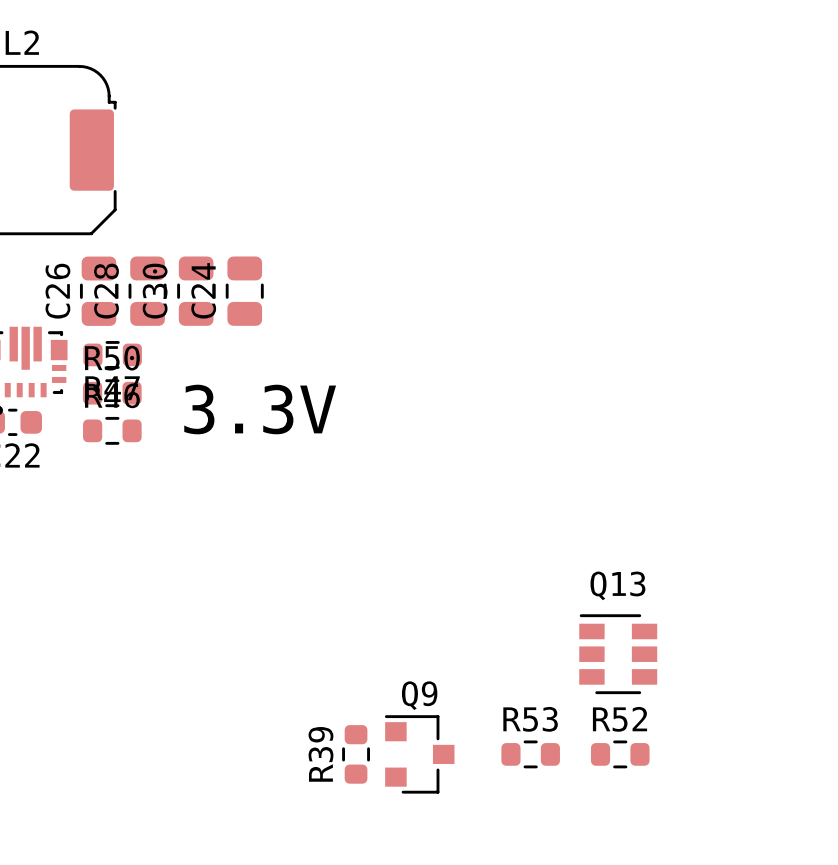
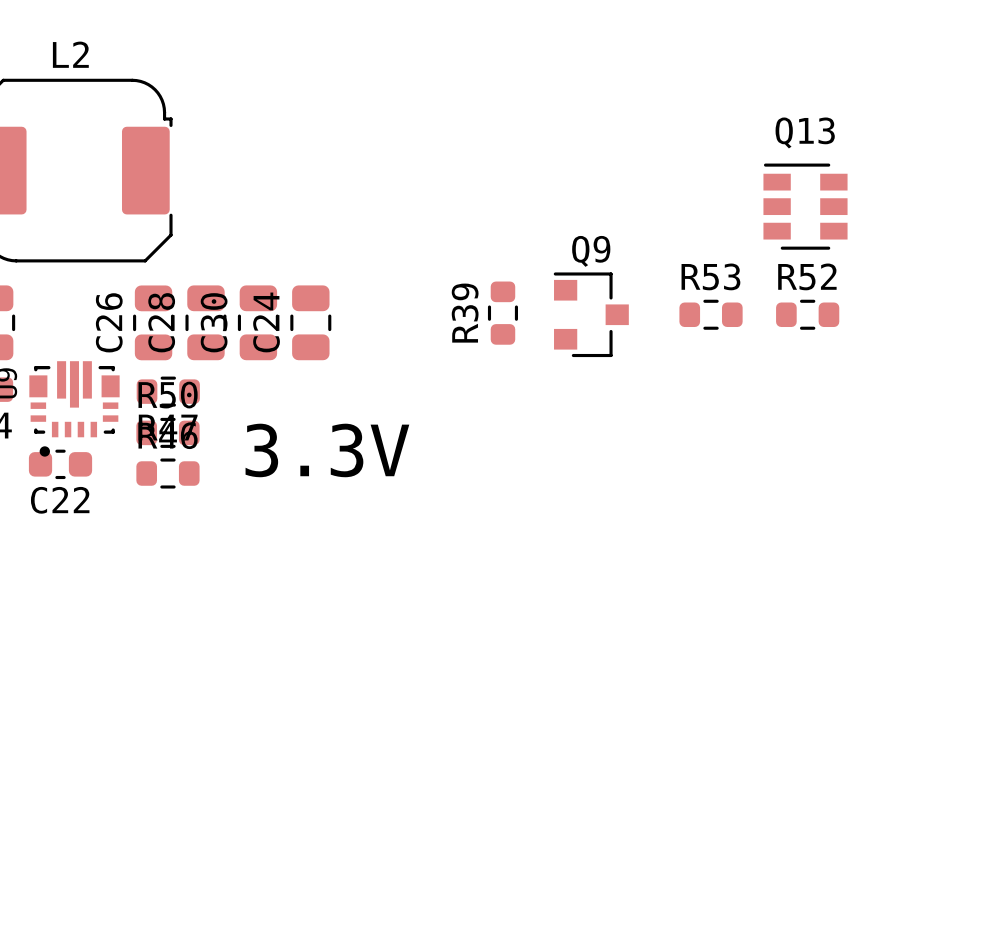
Q13 position: (618, 654) -> (805, 206)
R39 position: (356, 754) -> (502, 313)
Q9 position: (419, 754) -> (591, 314)
R53 position: (530, 754) -> (711, 314)
R52 position: (620, 754) -> (807, 314)

